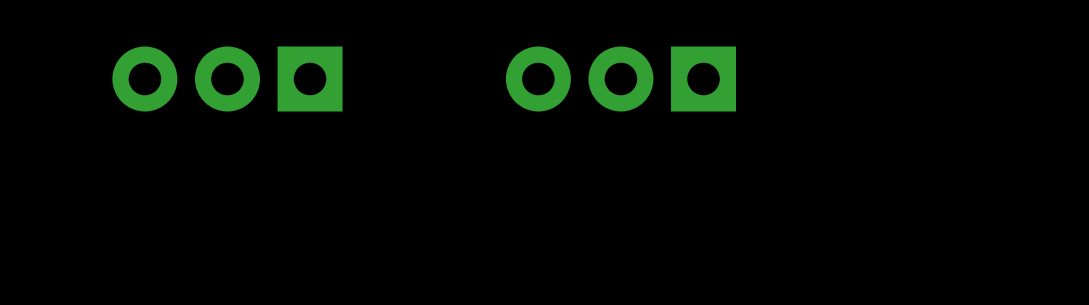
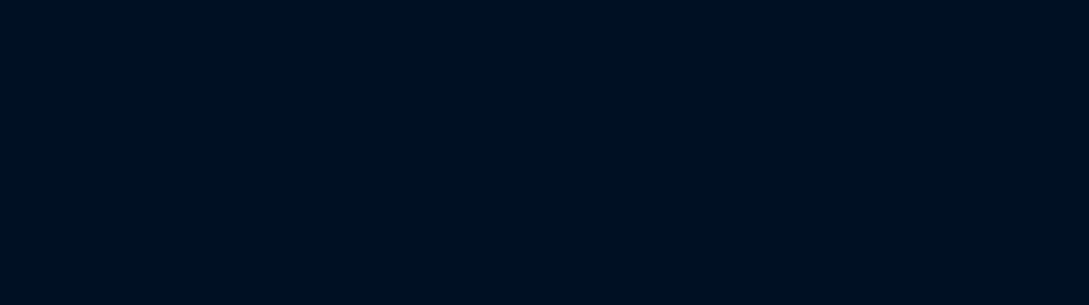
part: (227, 79) -> none
part: (620, 79) -> none

